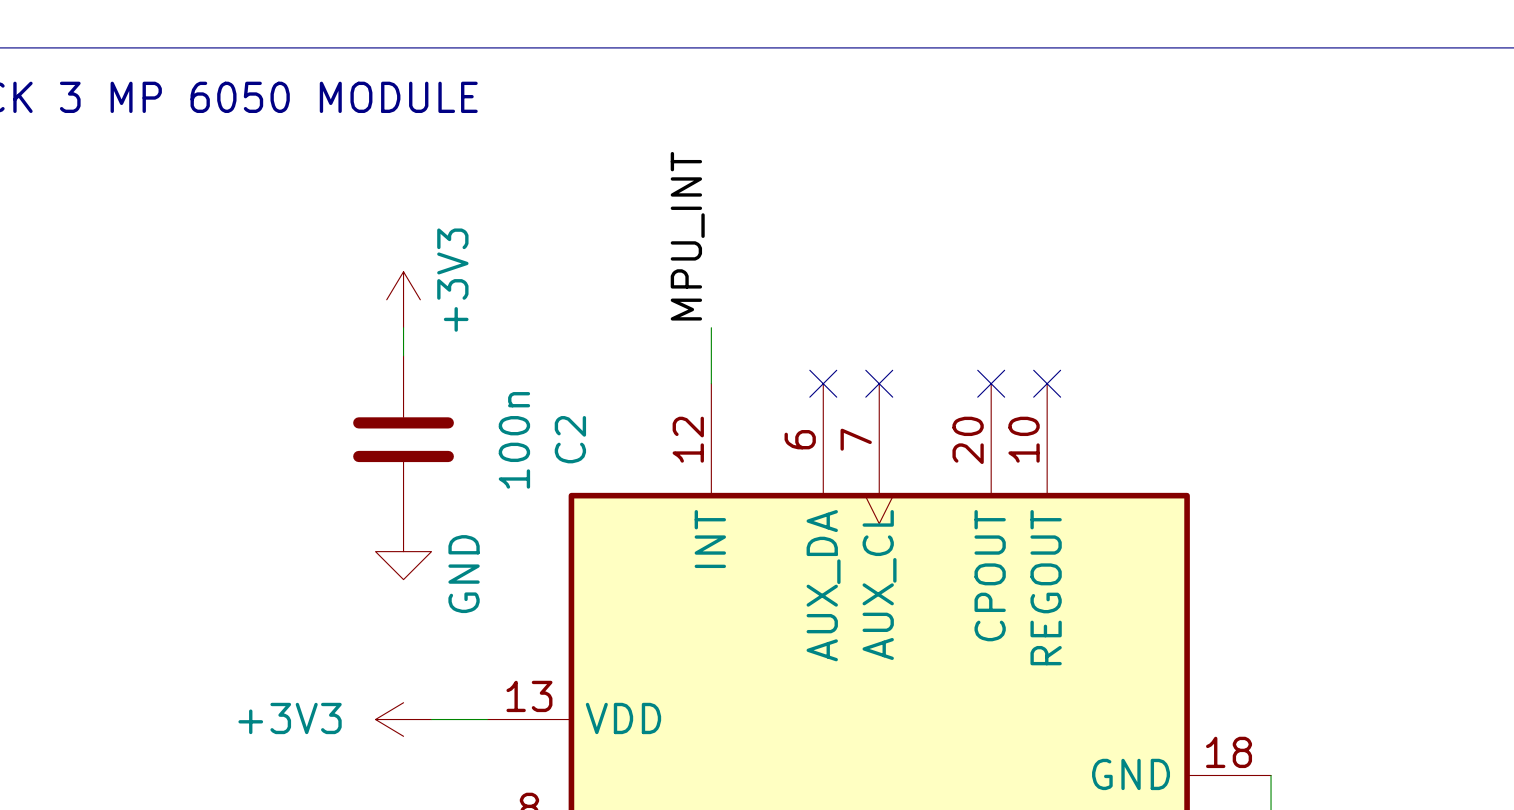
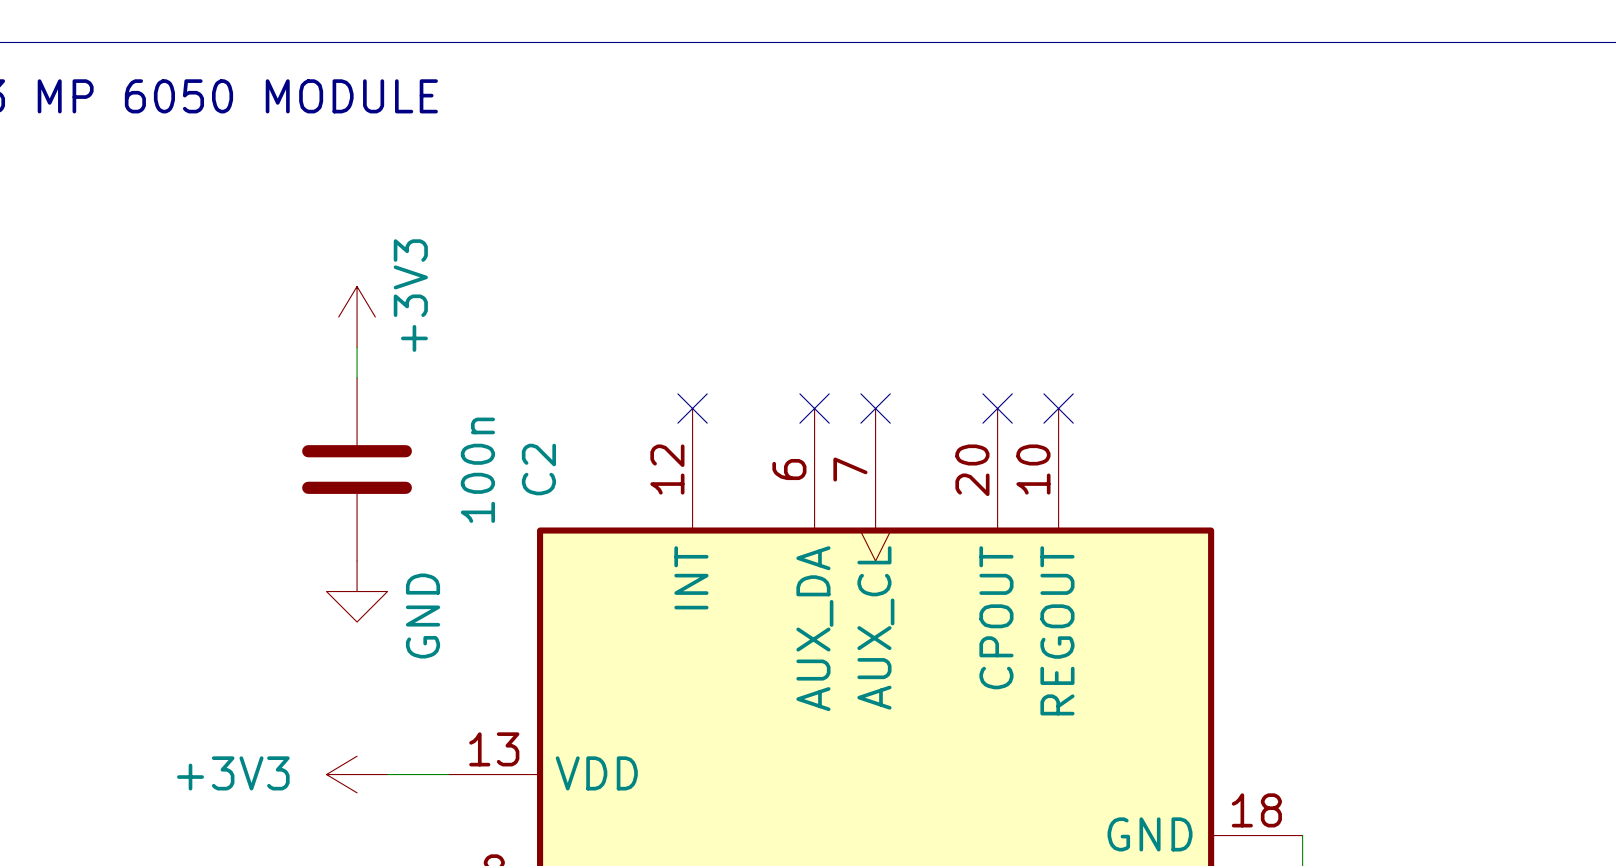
label: MPU_INT (687, 236) -> none
wire: (711, 327) (711, 383) -> none
no-connect mark: none -> (692, 408)

